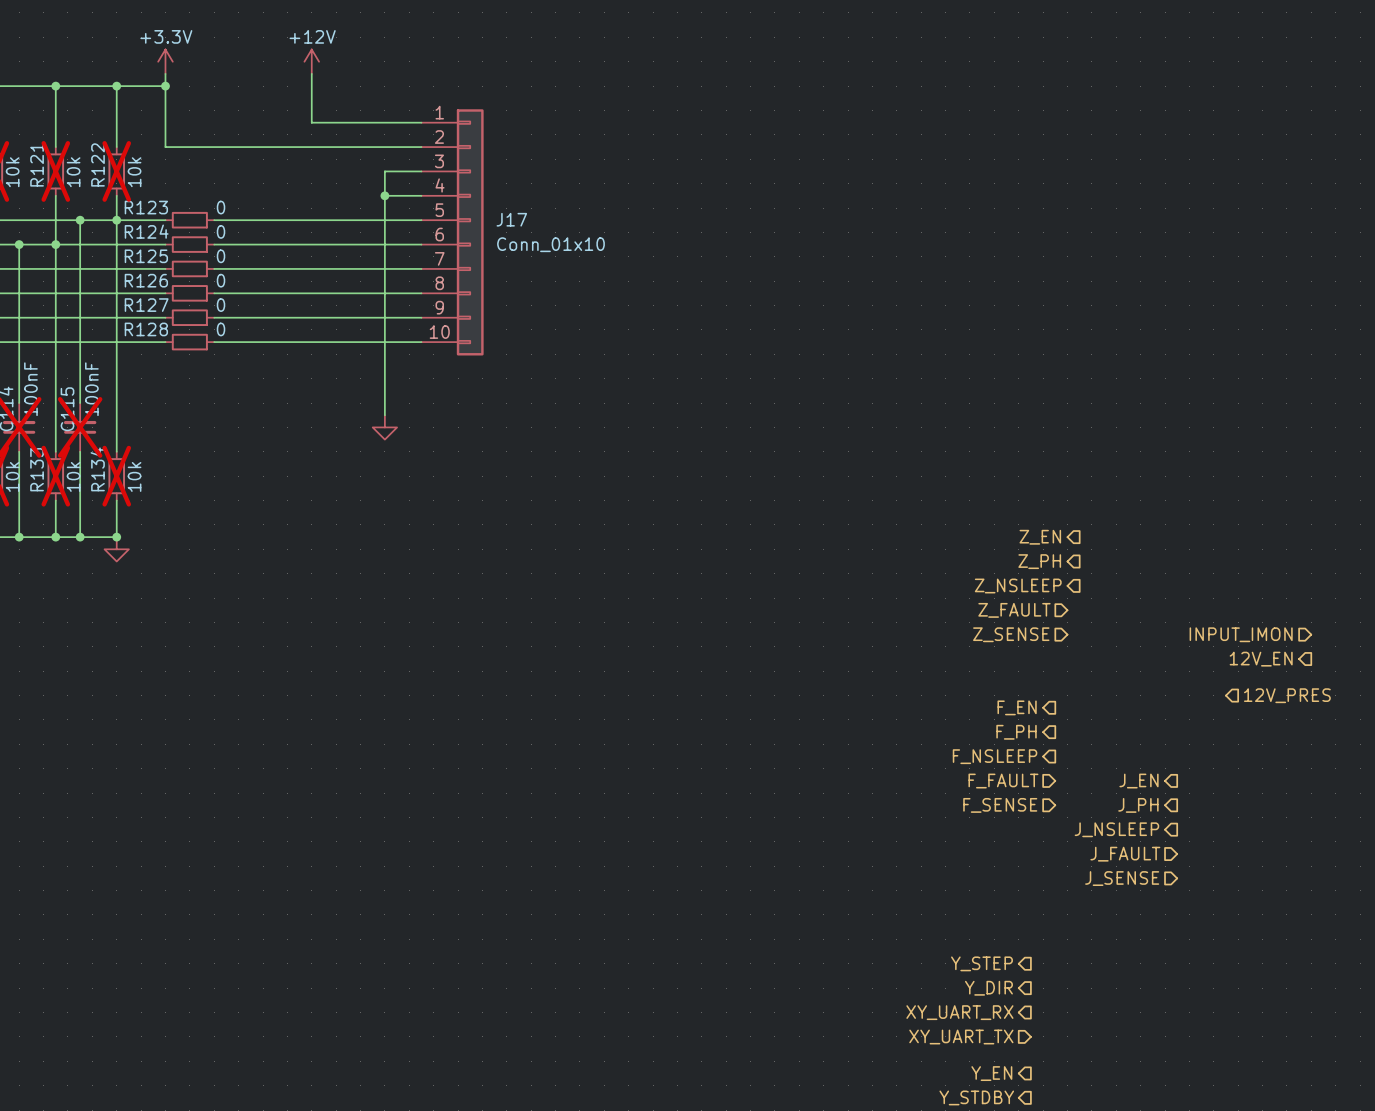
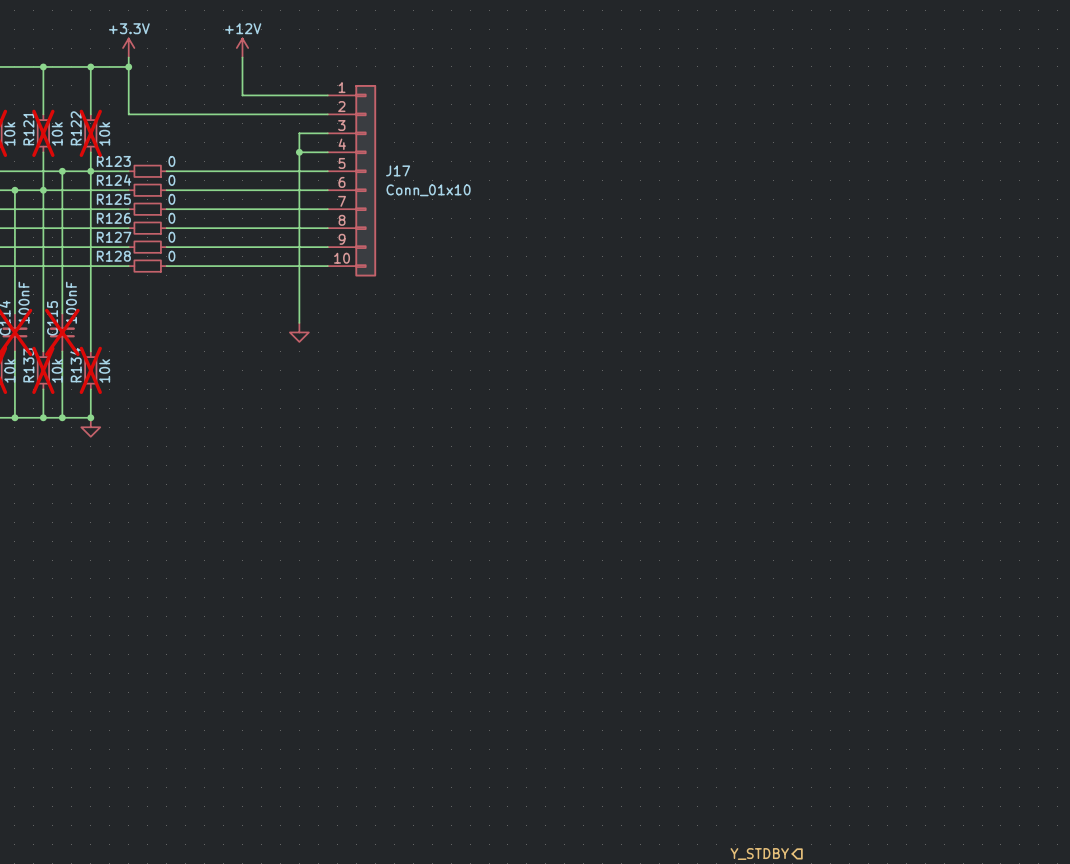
hierarchical label: Z_EN (1040, 537) -> none
hierarchical label: Z_PH (1039, 561) -> none
hierarchical label: Z_NSLEEP (1018, 586) -> none
hierarchical label: Z_FAULT (1014, 610) -> none
hierarchical label: Z_SENSE (1011, 634) -> none
hierarchical label: INPUT_IMON (1241, 634) -> none
hierarchical label: 12V_EN (1261, 659) -> none
hierarchical label: 12V_PRES (1287, 695) -> none
hierarchical label: F_EN (1017, 707) -> none
hierarchical label: F_PH (1016, 732) -> none
hierarchical label: F_NSLEEP (995, 756) -> none
hierarchical label: F_FAULT (1003, 781) -> none
hierarchical label: J_EN (1138, 781) -> none
hierarchical label: F_SENSE (1000, 805) -> none
hierarchical label: J_PH (1138, 805) -> none
hierarchical label: J_NSLEEP (1116, 829) -> none
hierarchical label: J_FAULT (1125, 854) -> none
hierarchical label: J_SENSE (1122, 878) -> none
hierarchical label: Y_STEP (981, 963) -> none
hierarchical label: Y_DIR (988, 988) -> none
hierarchical label: XY_UART_RX (959, 1012) -> none
hierarchical label: XY_UART_TX (961, 1037) -> none
hierarchical label: Y_EN (991, 1073) -> none

